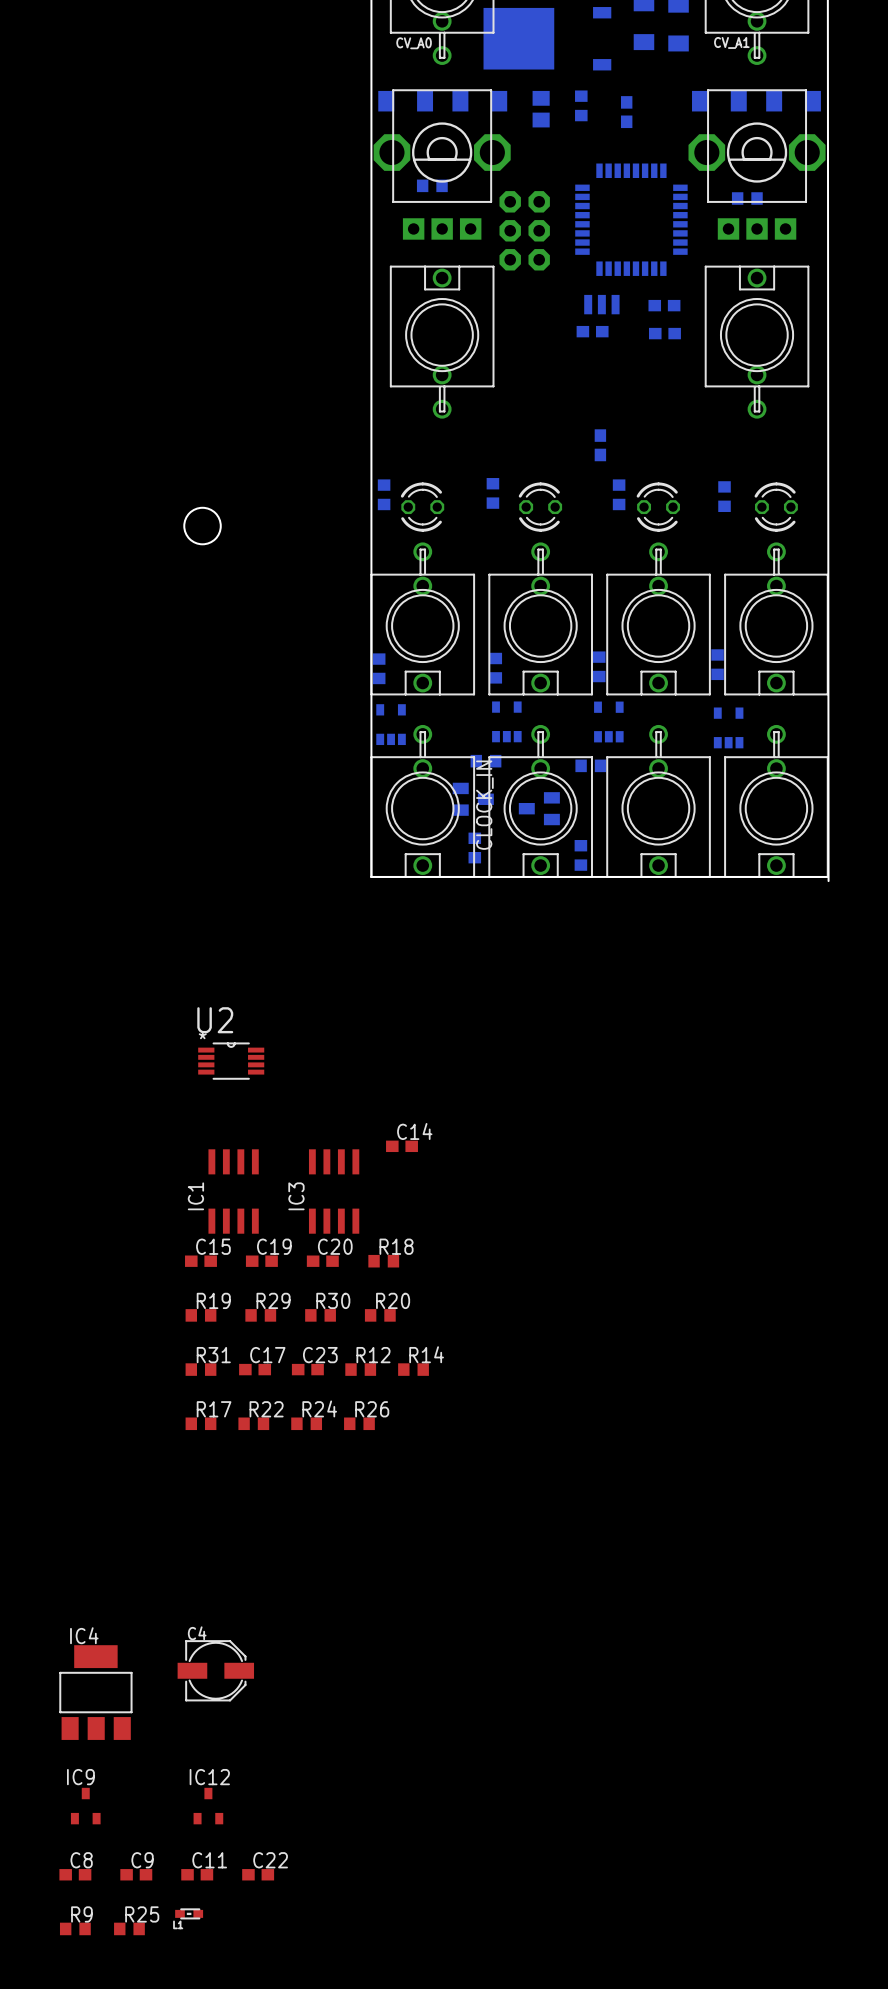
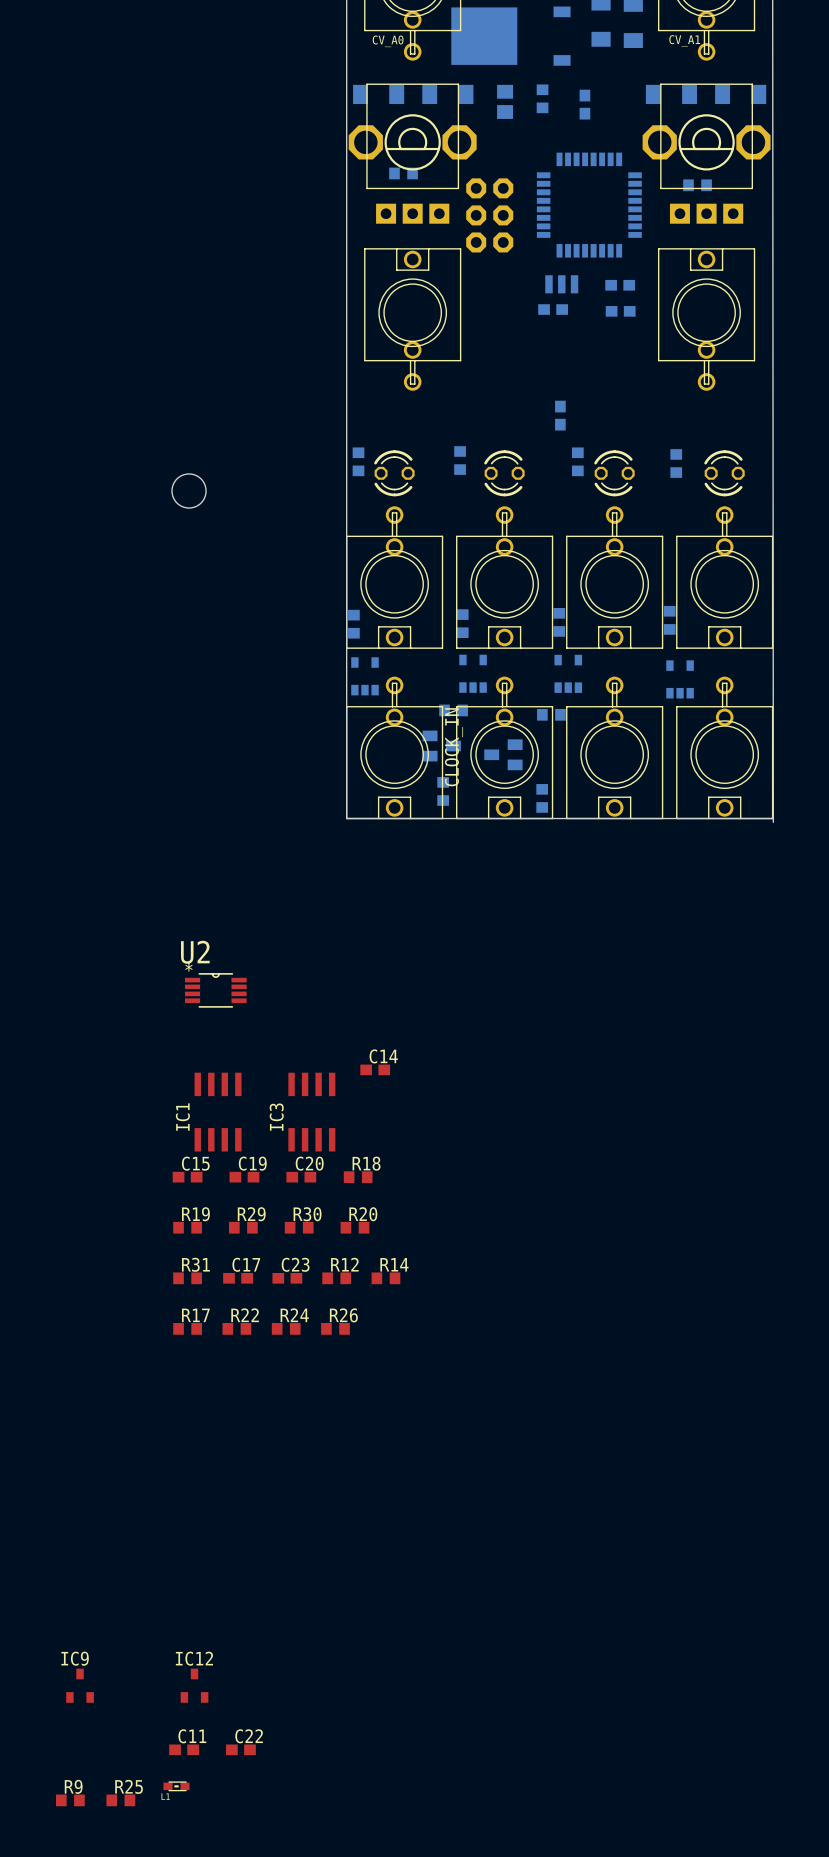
C4: (215, 1670) -> none
IC4: (95, 1692) -> none
C8: (75, 1874) -> none
C9: (136, 1874) -> none

